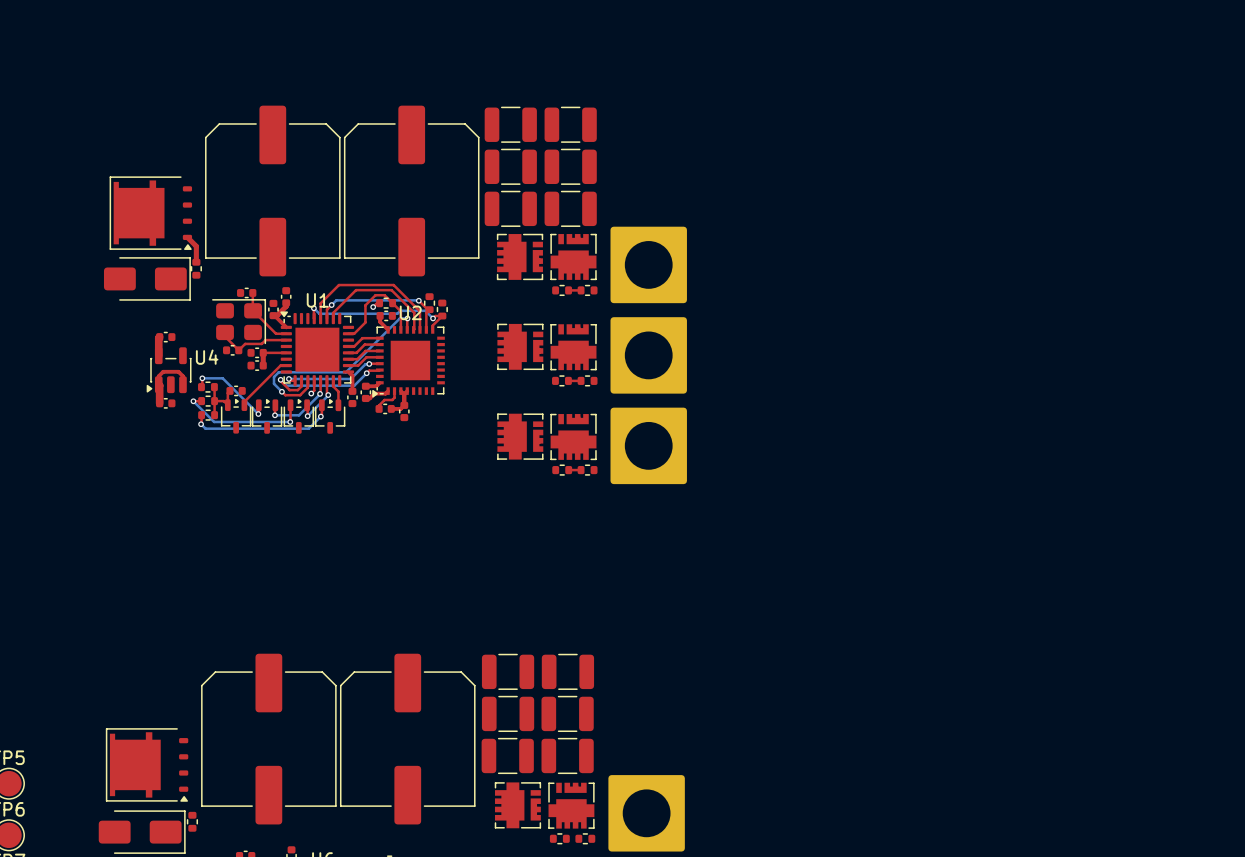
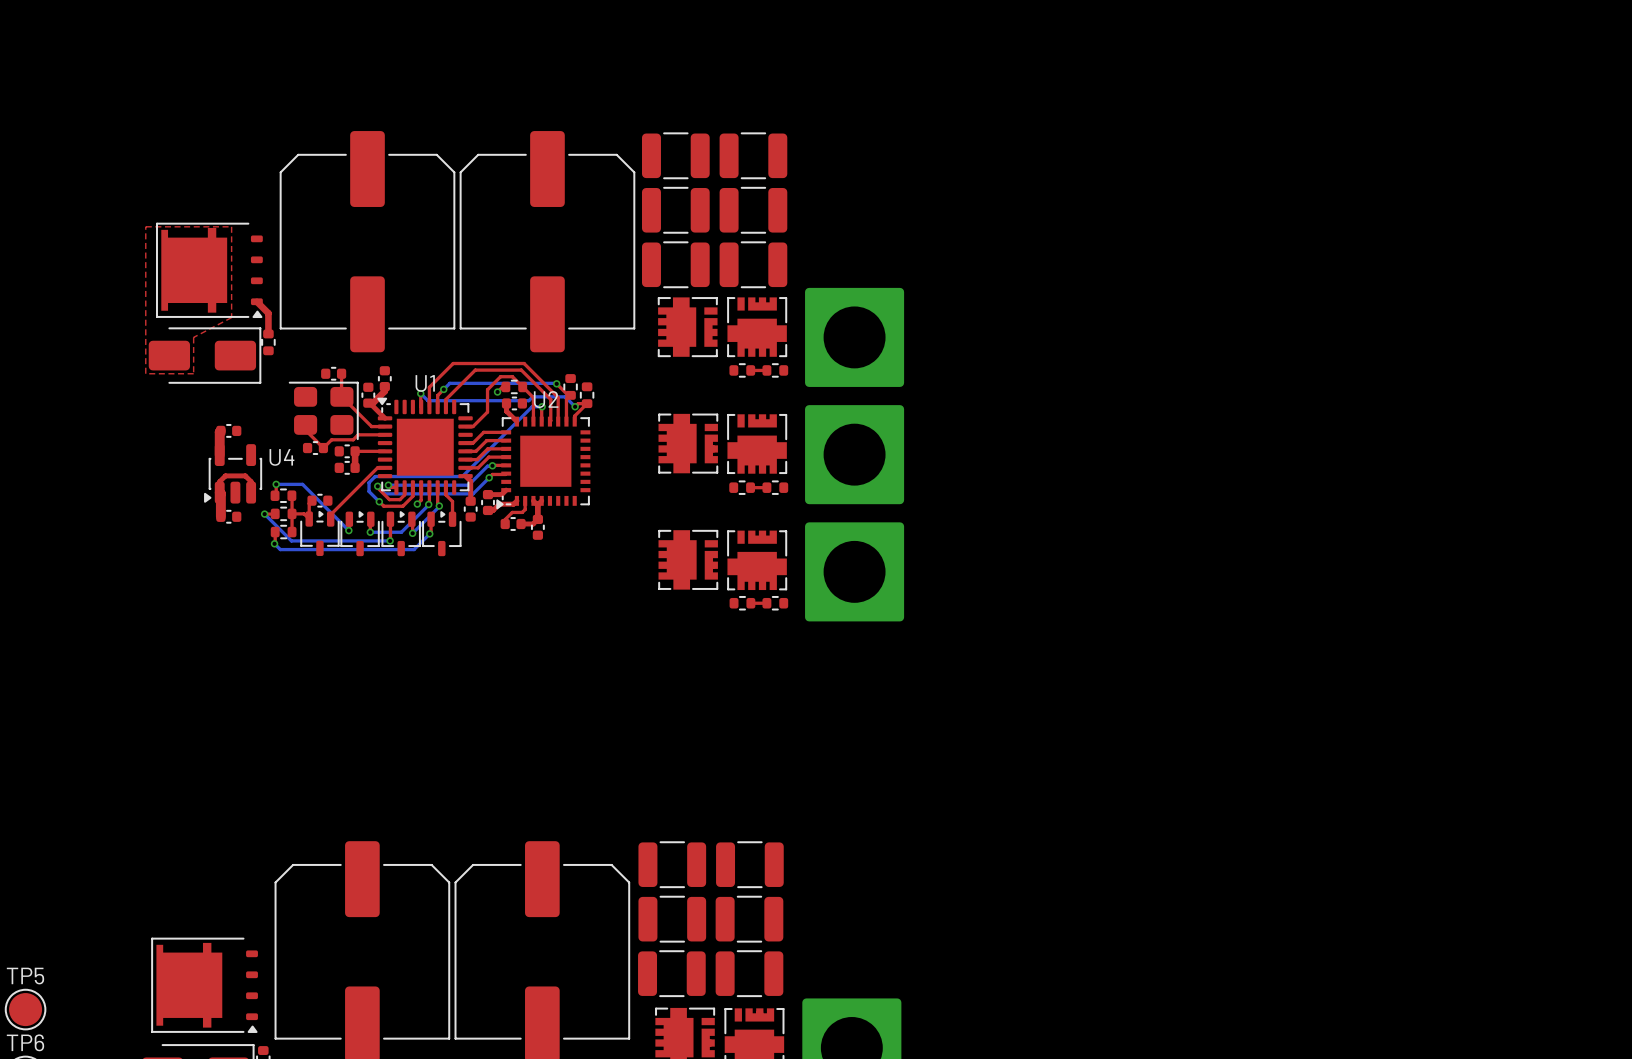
top zone outline: none -> (145, 226) (145, 373) (193, 373) (193, 337) (231, 317) (231, 226) (145, 226)

